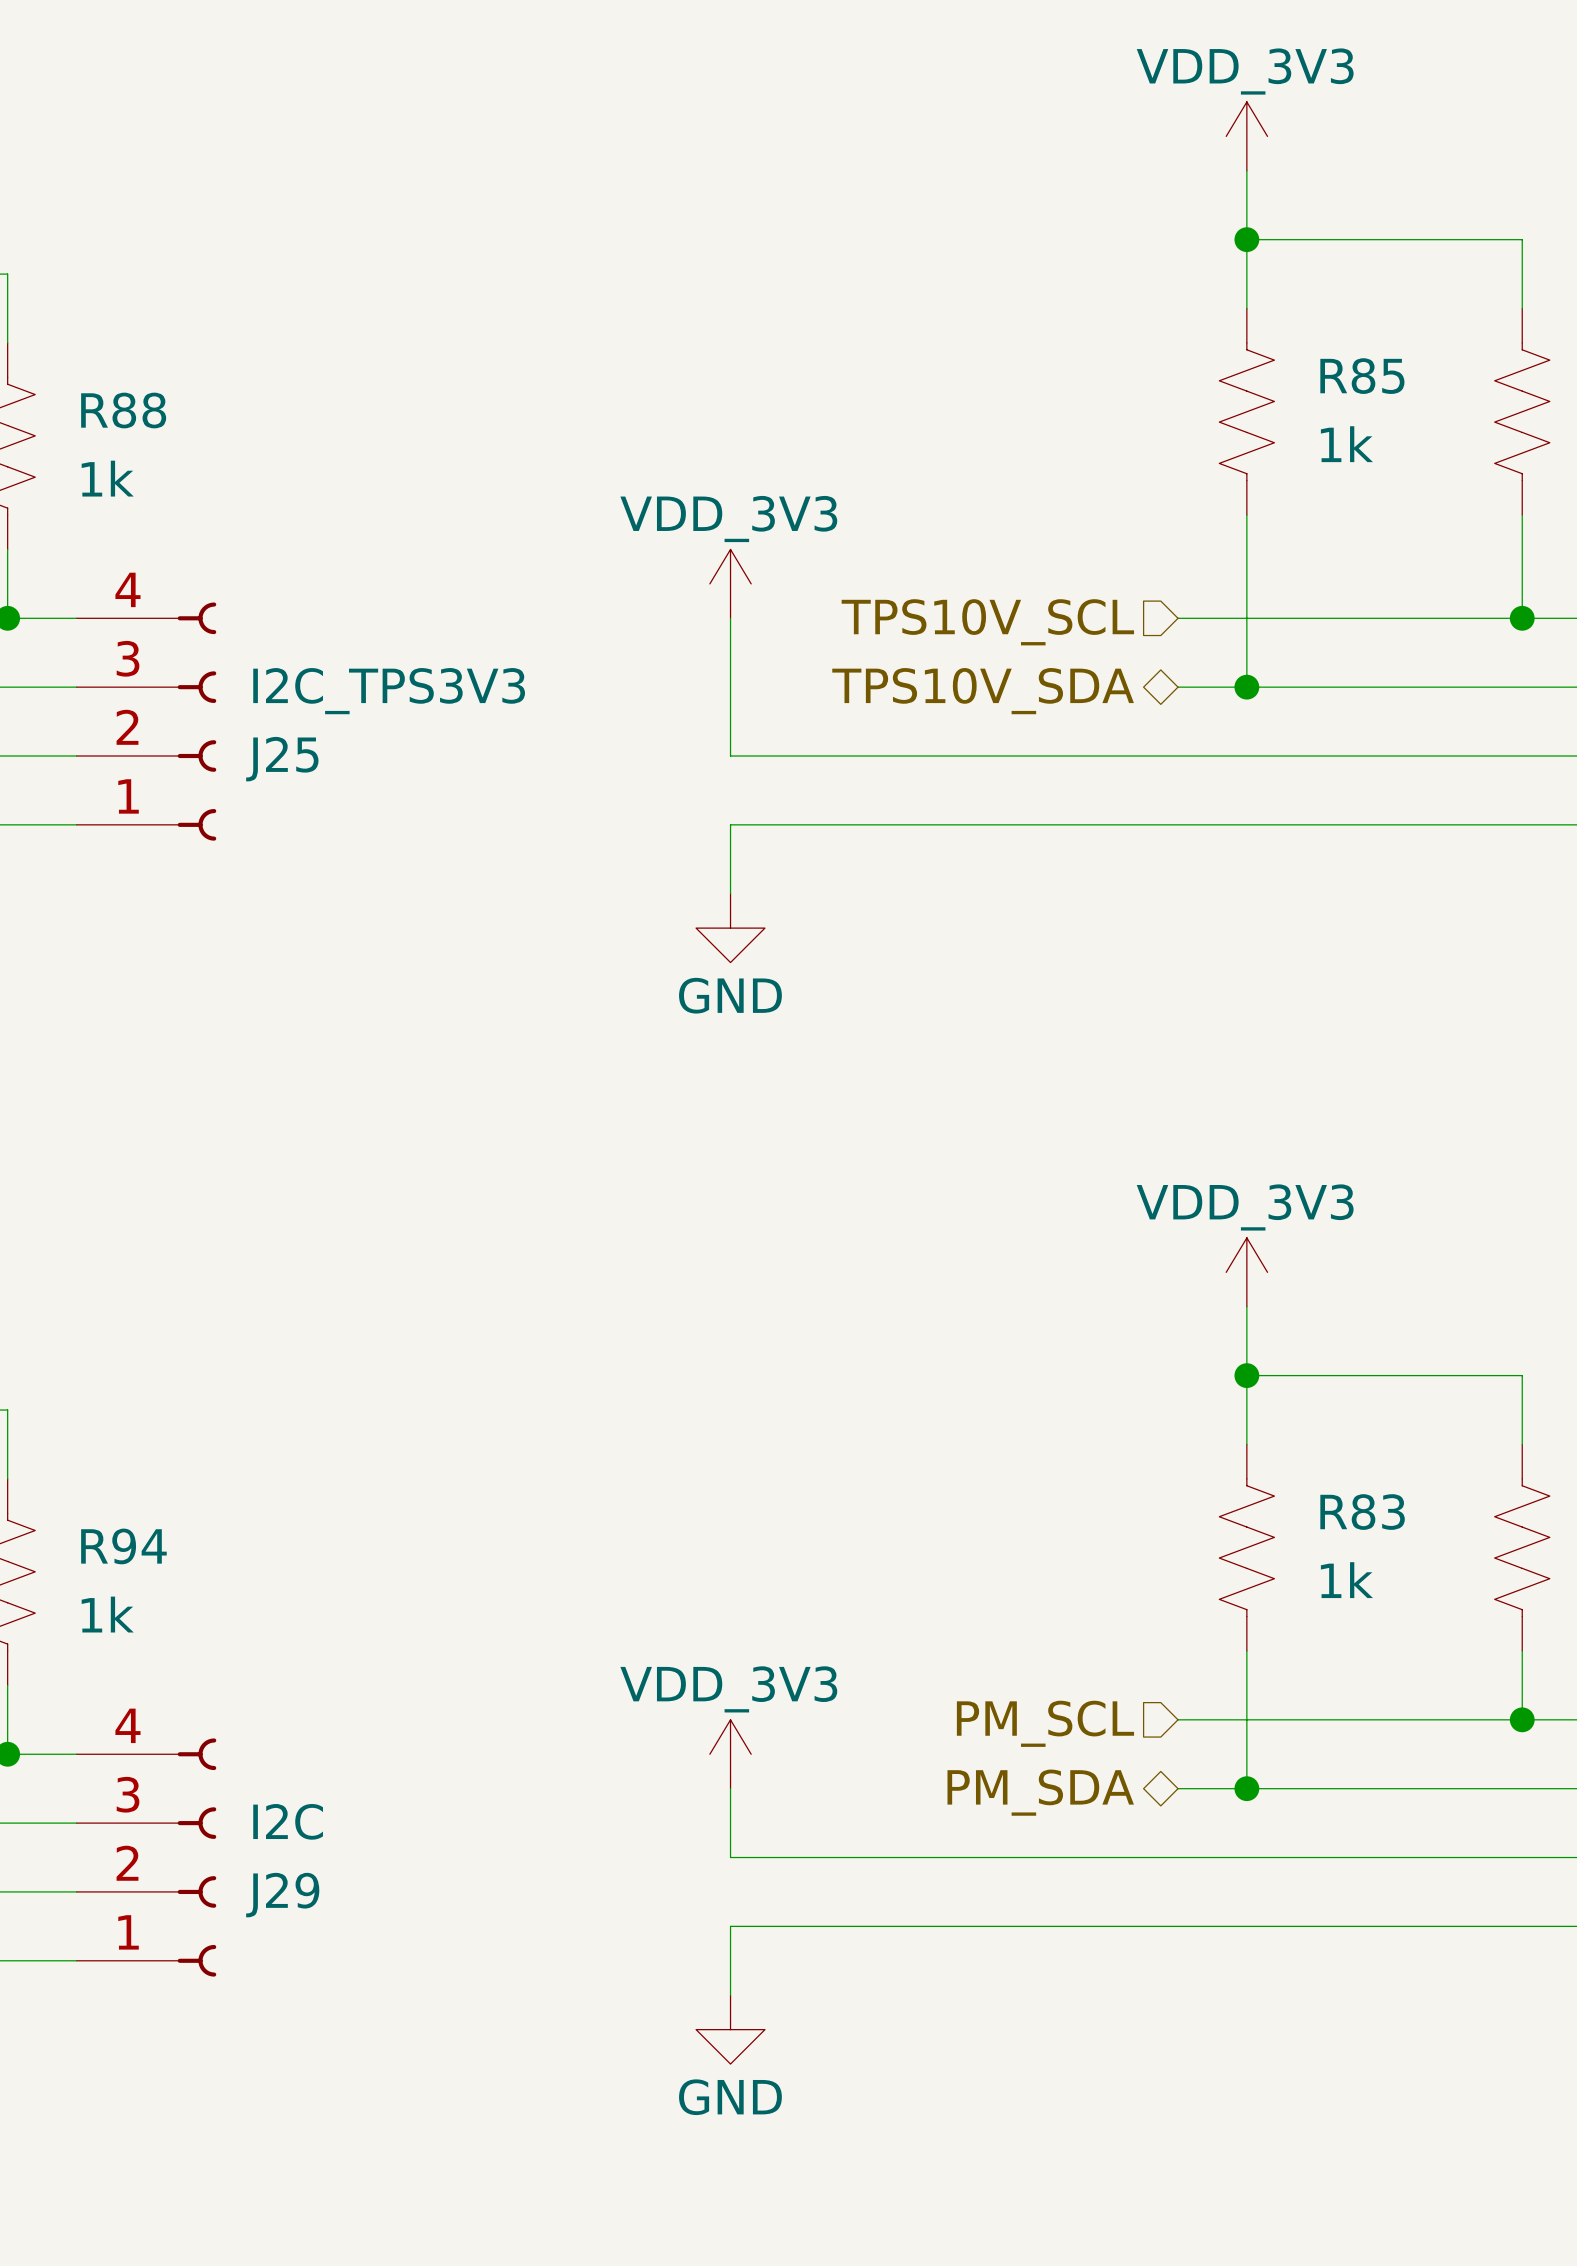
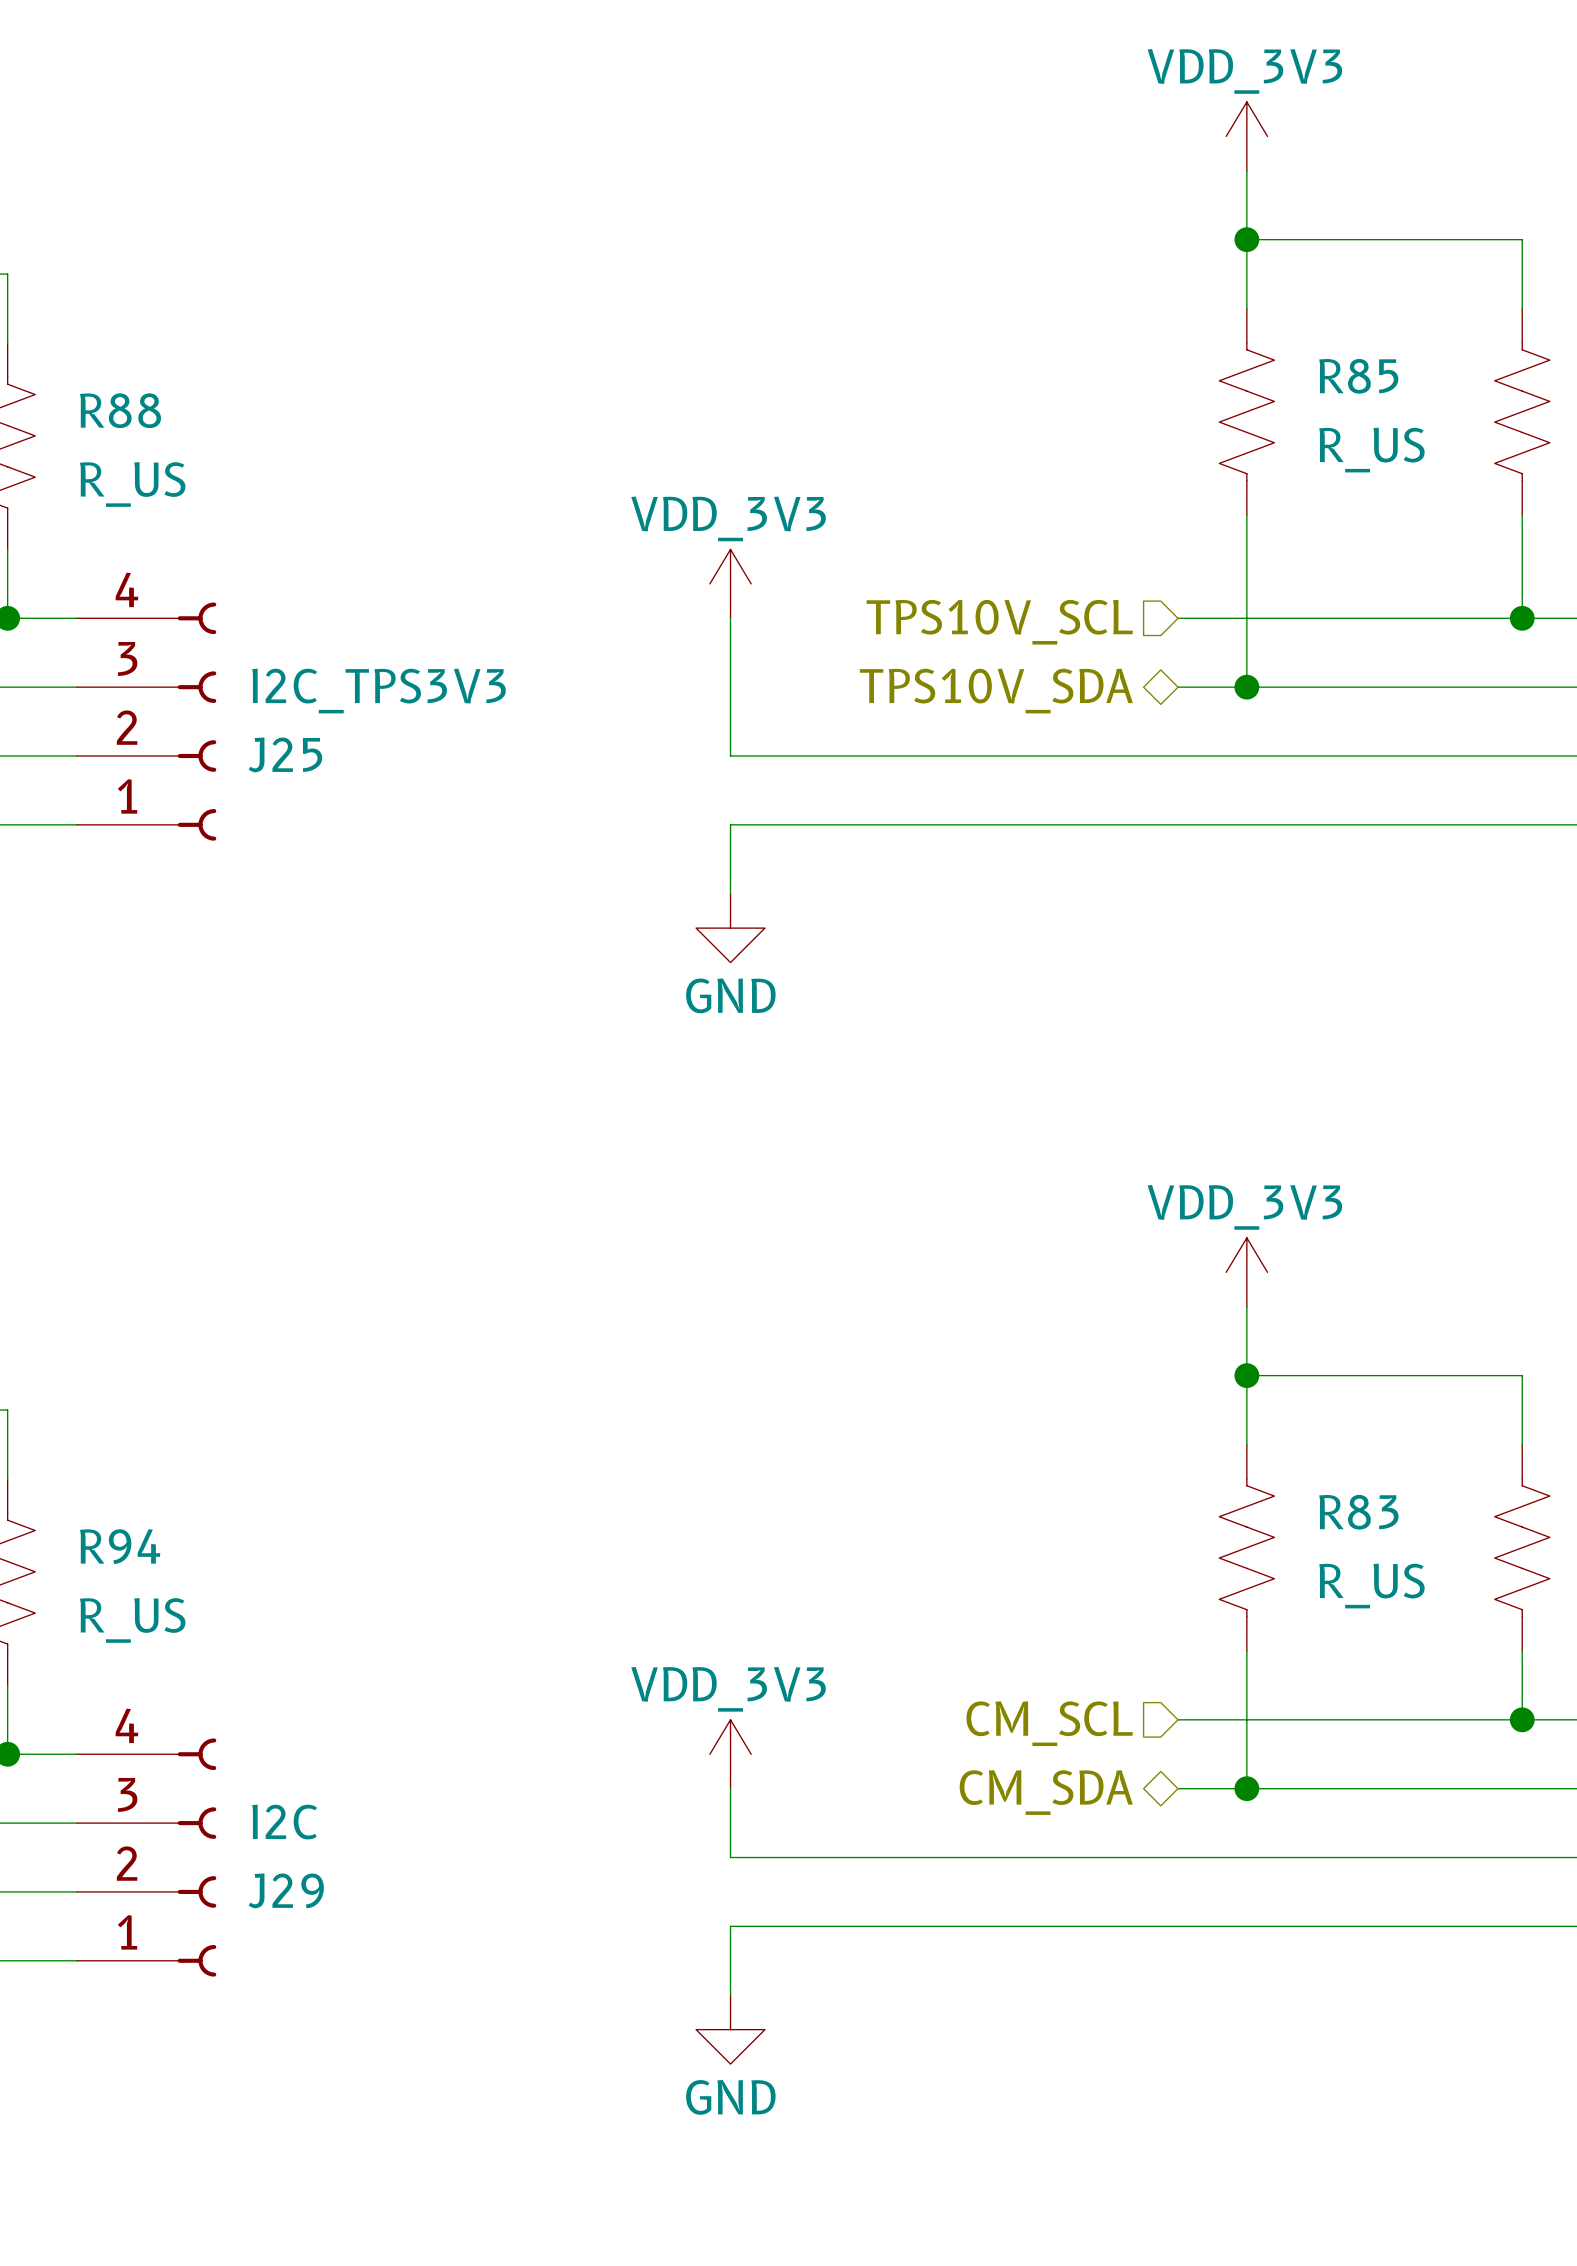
R85 value: 1k (1346, 444) -> R_US (1371, 450)
R88 value: 1k (107, 478) -> R_US (132, 484)
R83 value: 1k (1346, 1580) -> R_US (1371, 1586)
R94 value: 1k (107, 1614) -> R_US (132, 1620)
hierarchical label: PM_SCL (1045, 1723) -> CM_SCL (1049, 1723)
hierarchical label: PM_SDA (1040, 1792) -> CM_SDA (1046, 1792)

